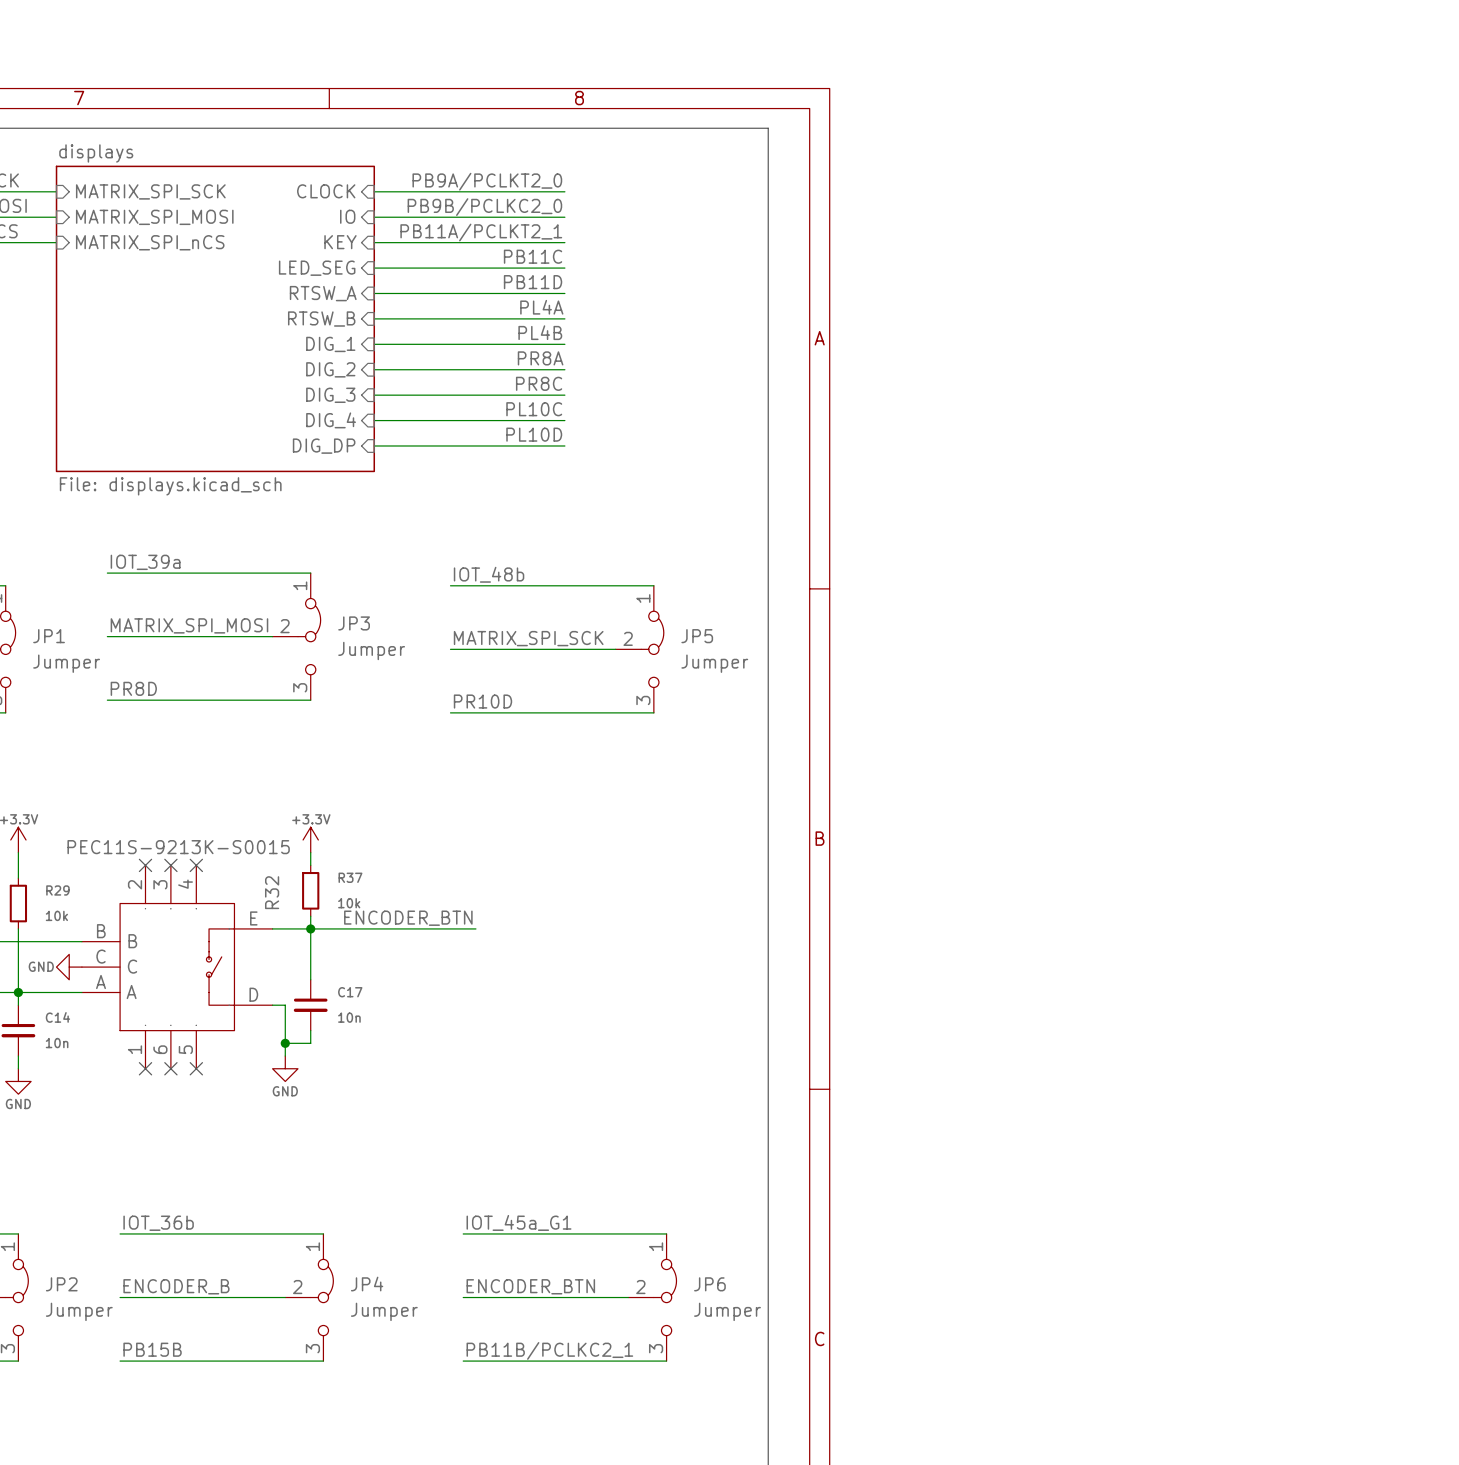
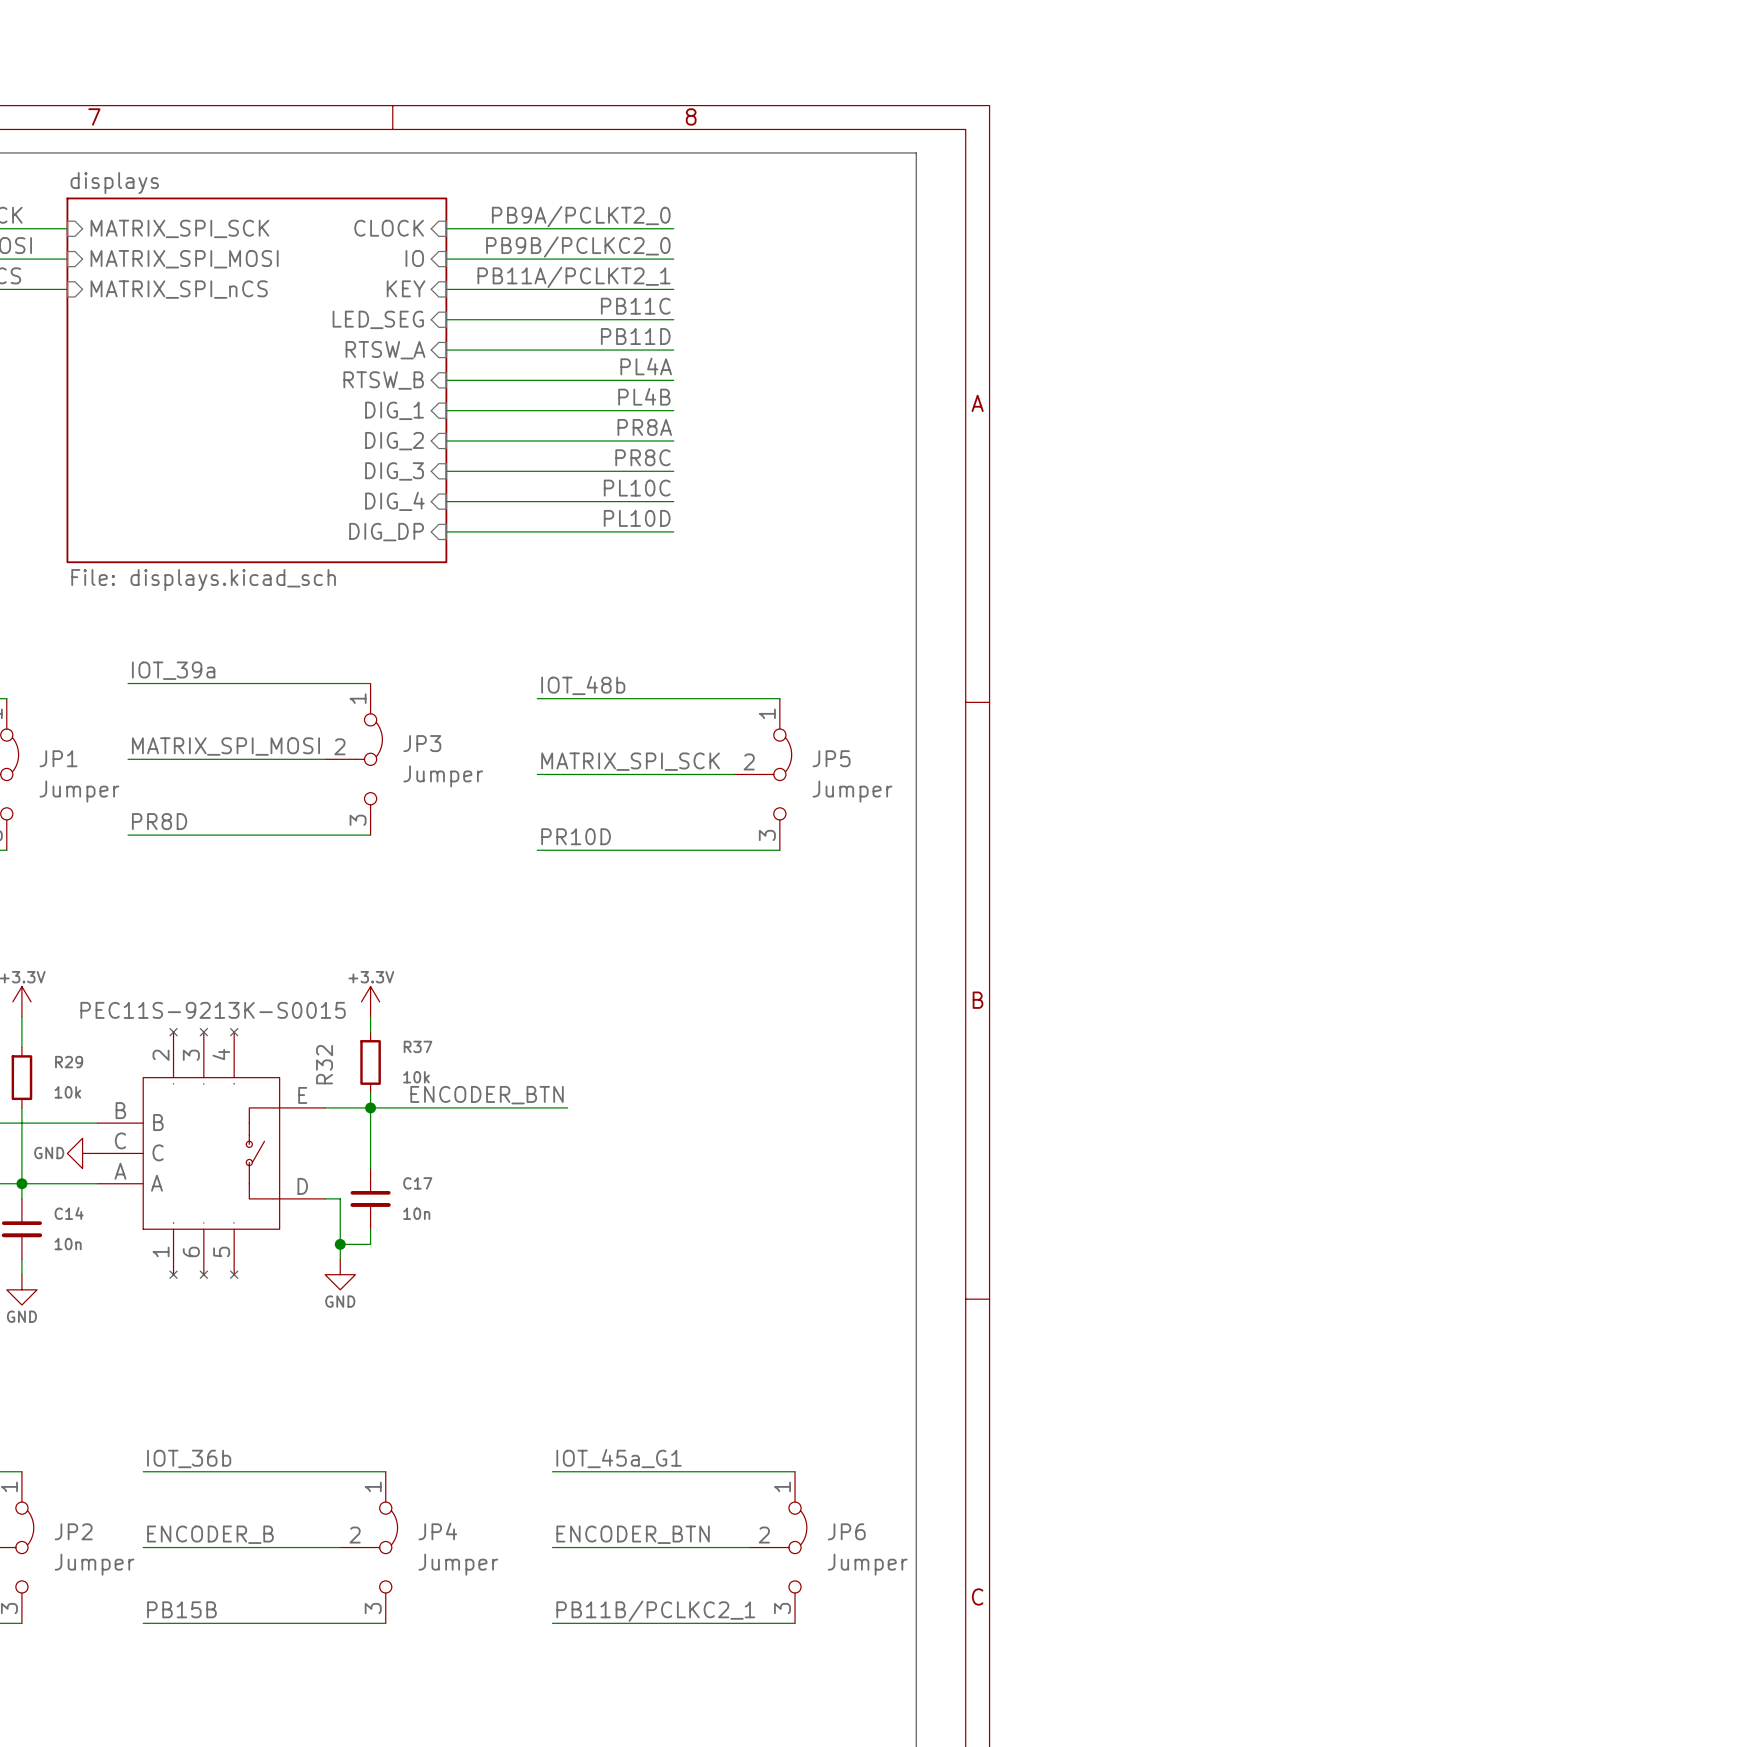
R32 symbol: [81, 865, 273, 1069] -> [97, 1028, 326, 1279]
no-connect mark: (145, 865) -> none
no-connect mark: (170, 865) -> none
no-connect mark: (196, 865) -> none
no-connect mark: (145, 1068) -> none
no-connect mark: (170, 1068) -> none
no-connect mark: (196, 1068) -> none

